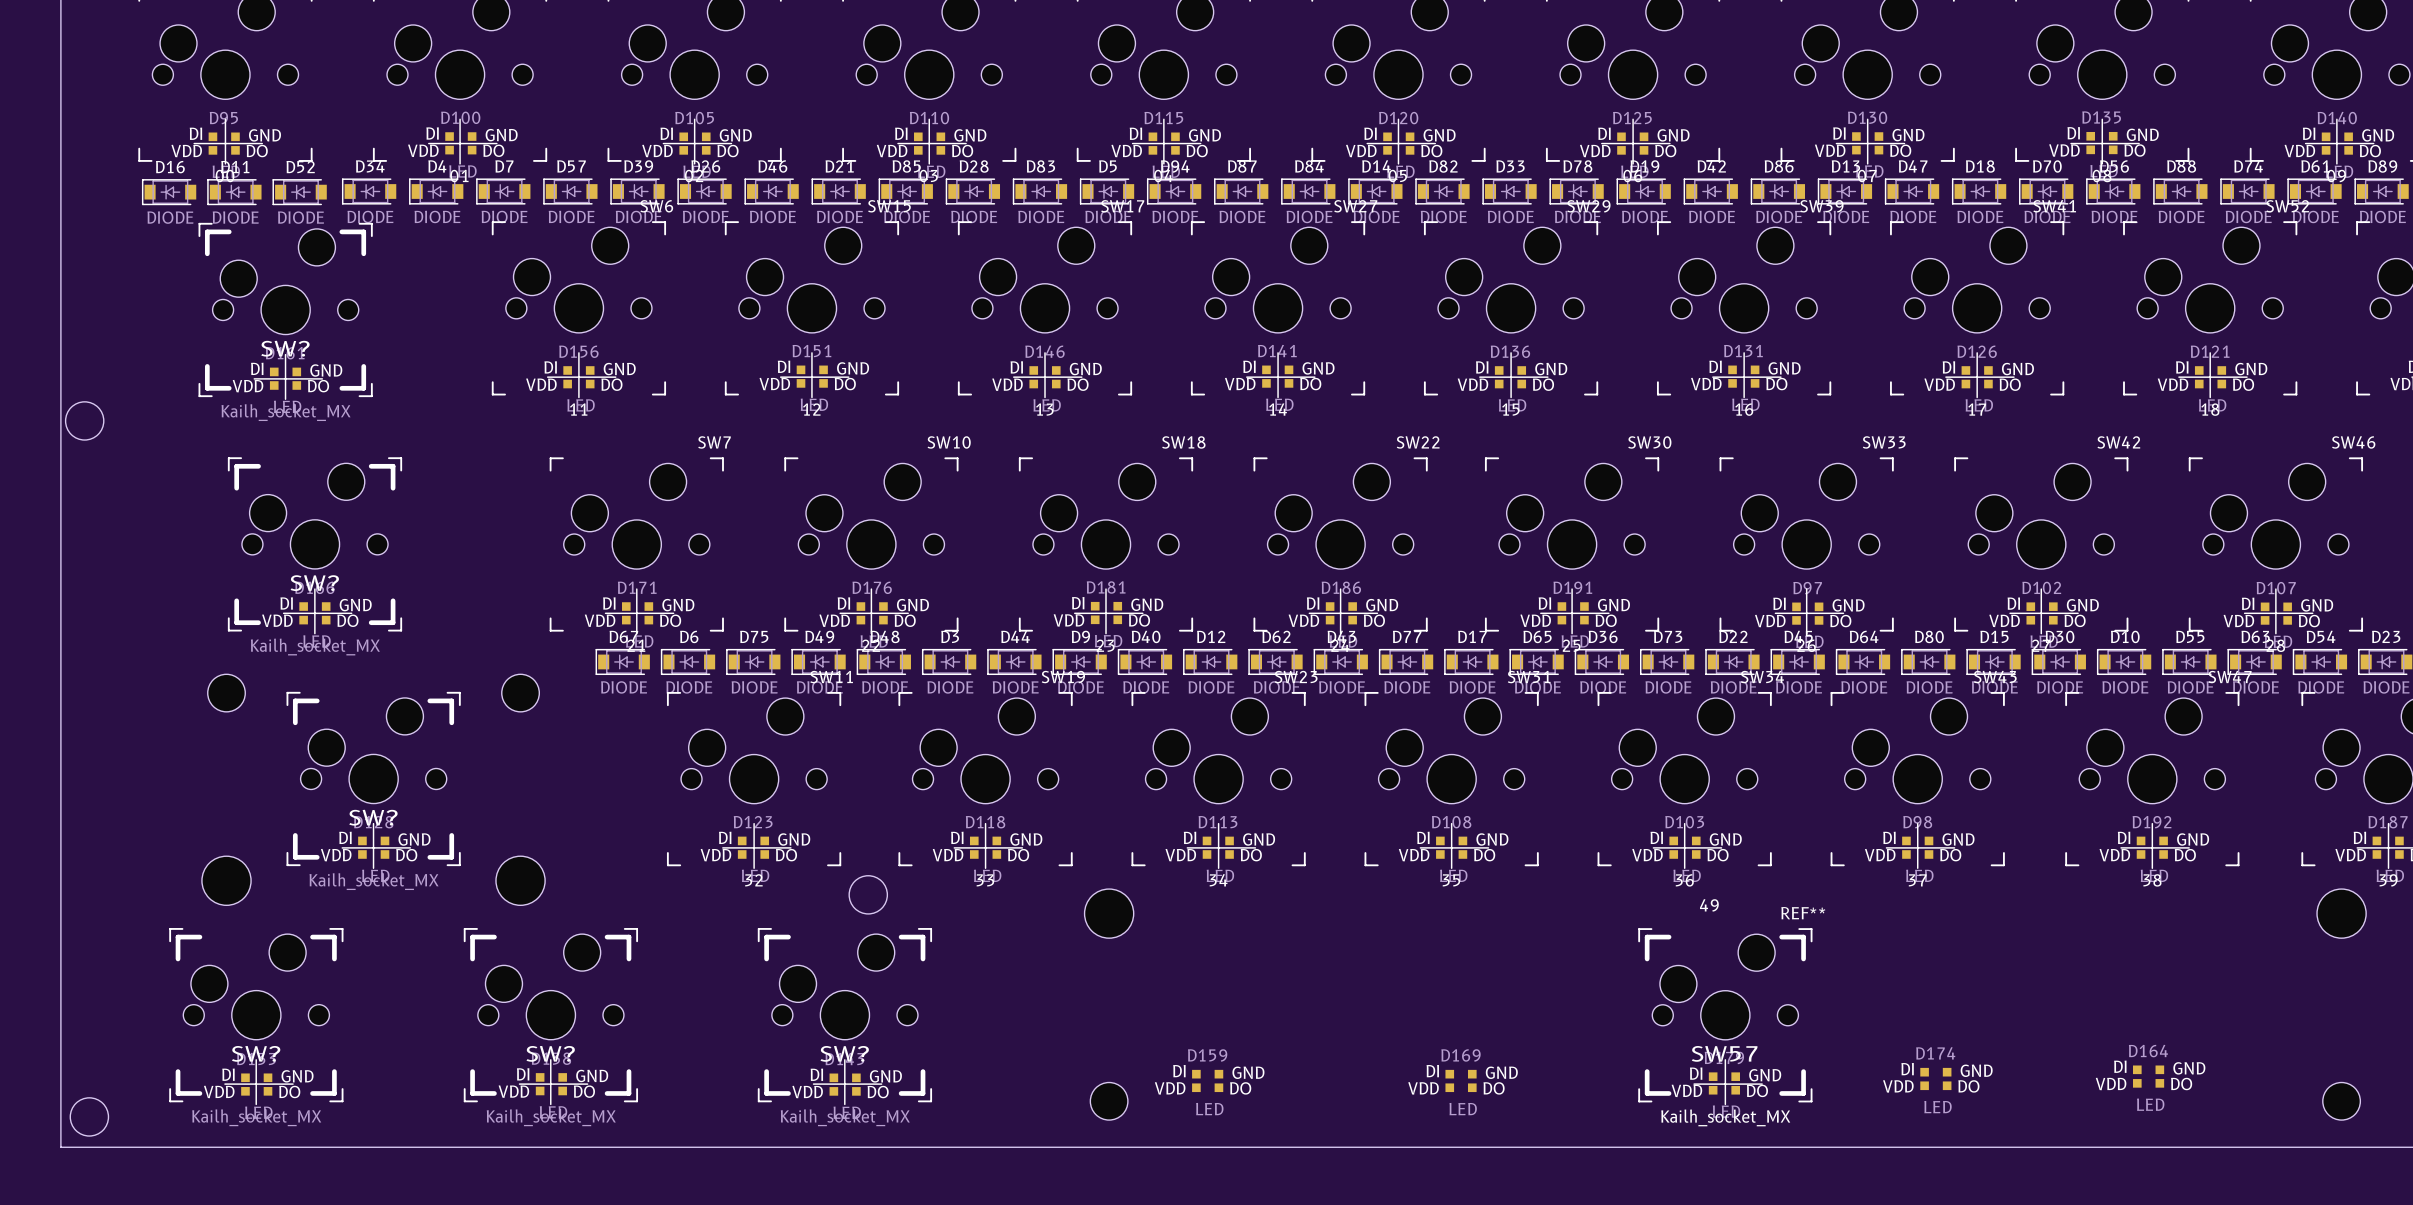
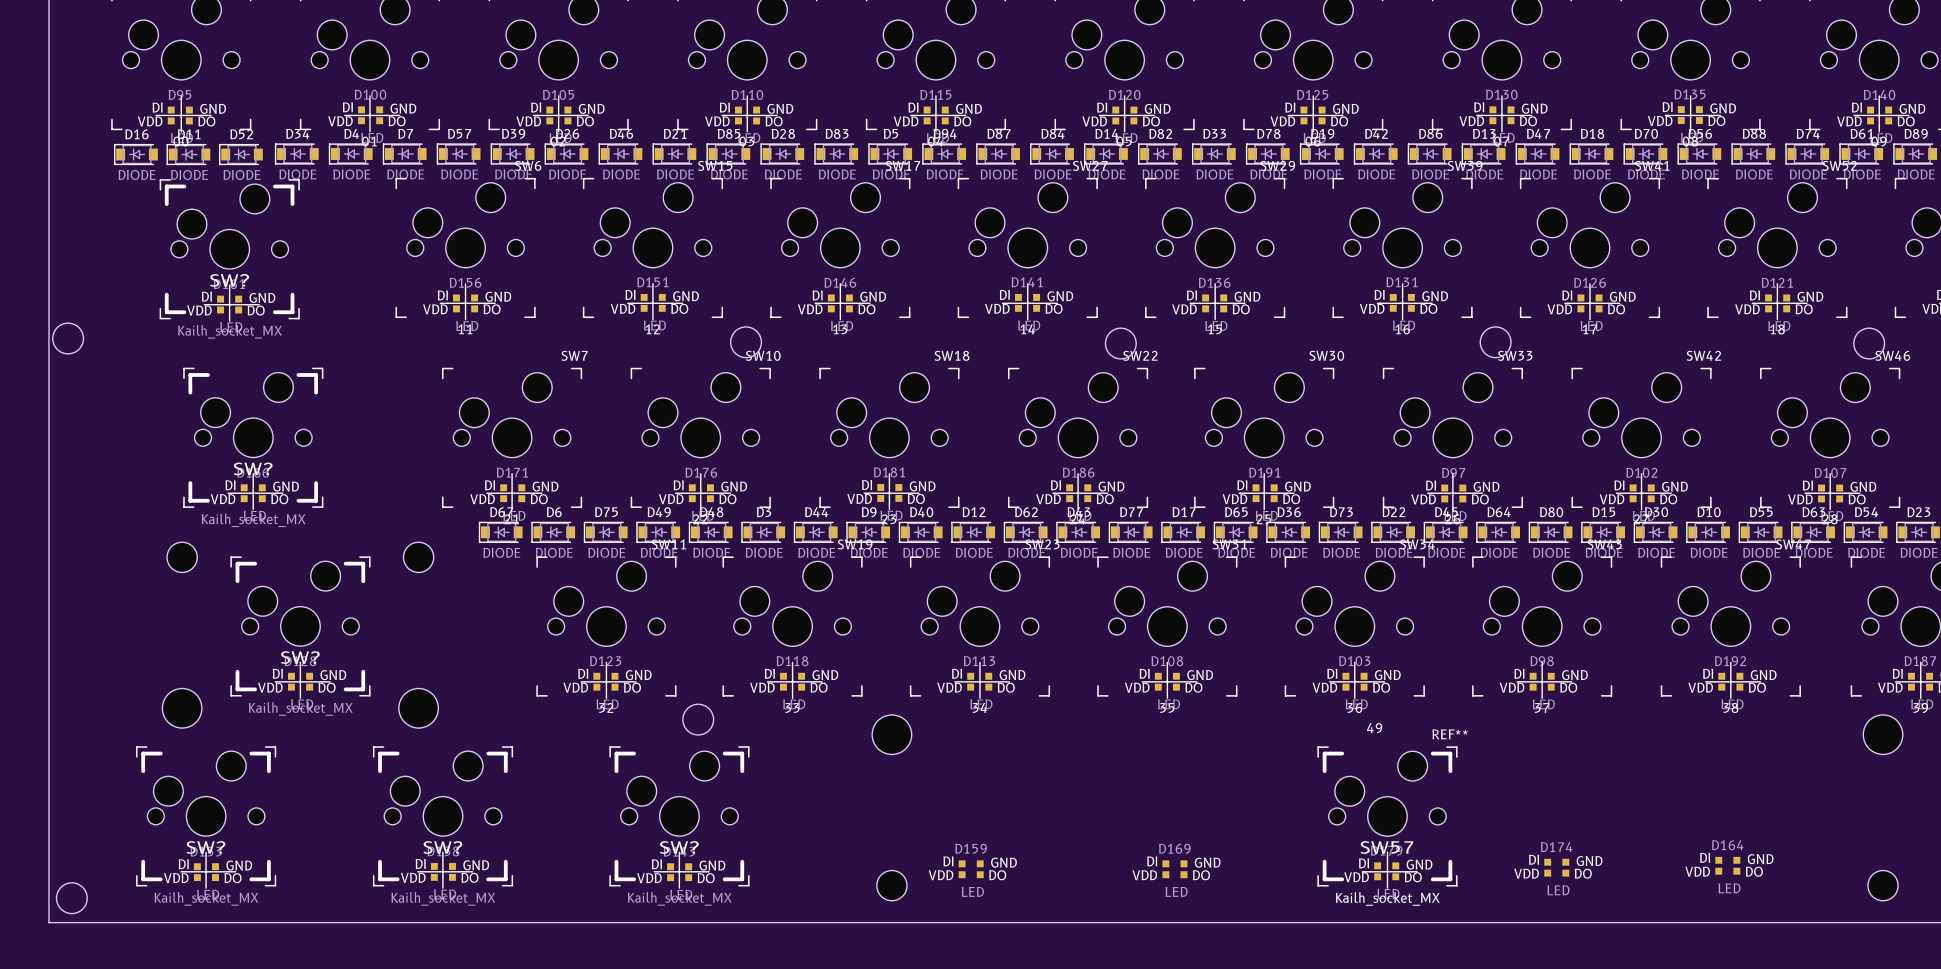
round board edge: none -> [730, 326, 762, 359]
round board edge: none -> [1479, 326, 1512, 359]
round board edge: none -> [1104, 327, 1137, 360]
round board edge: none -> [1853, 327, 1886, 360]

